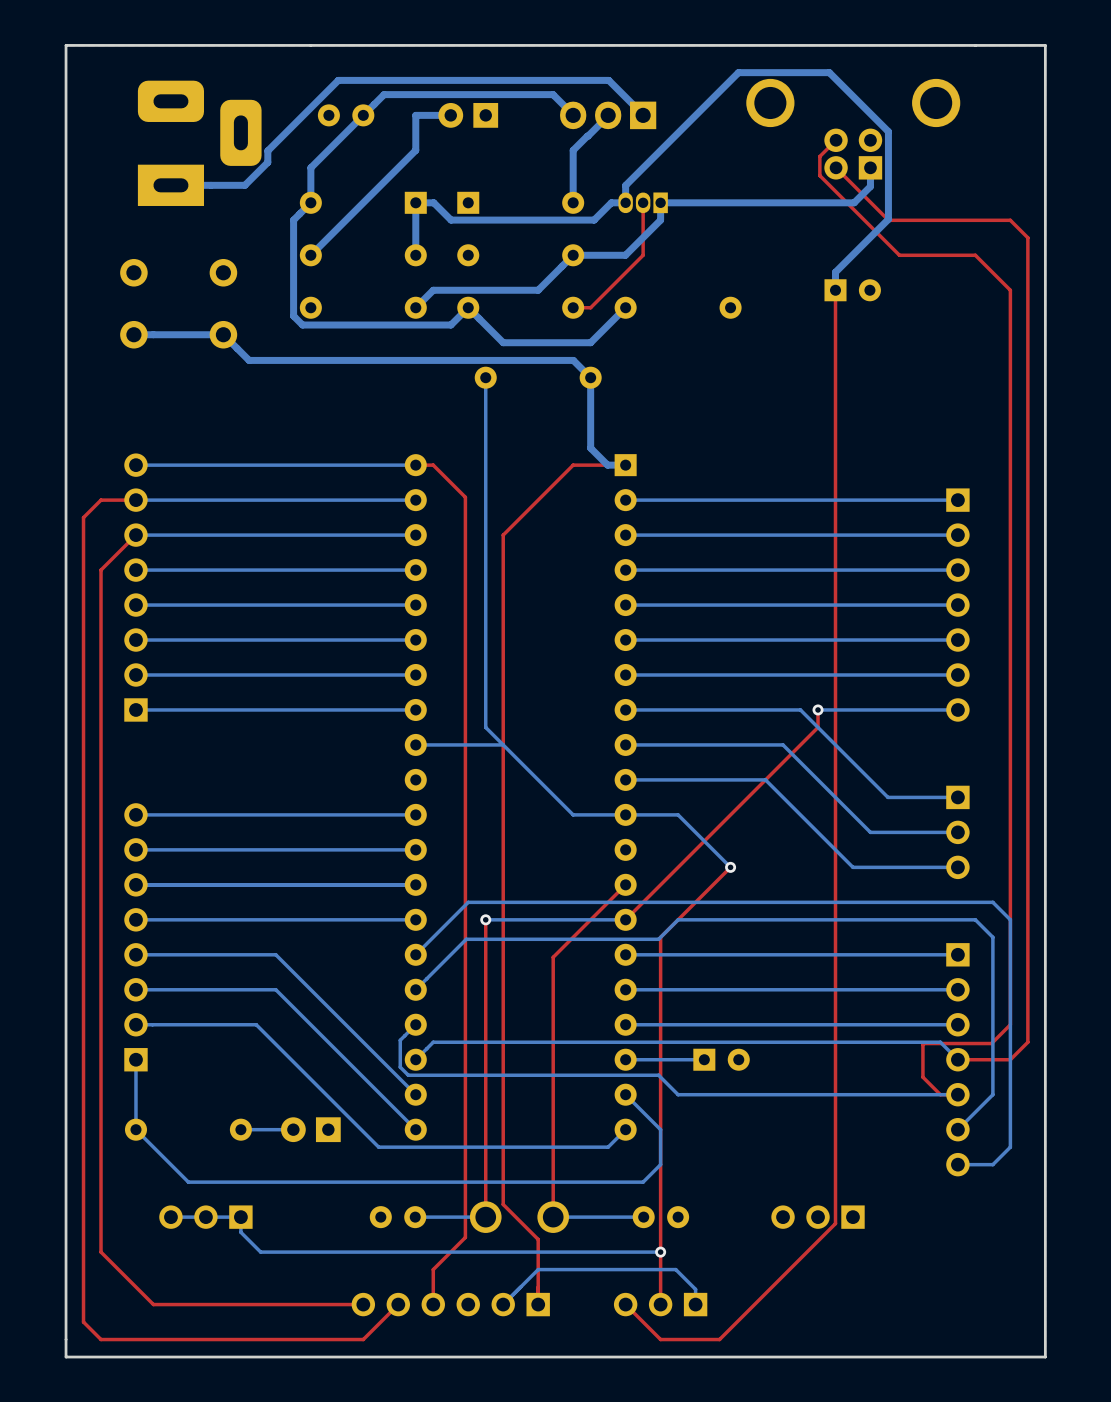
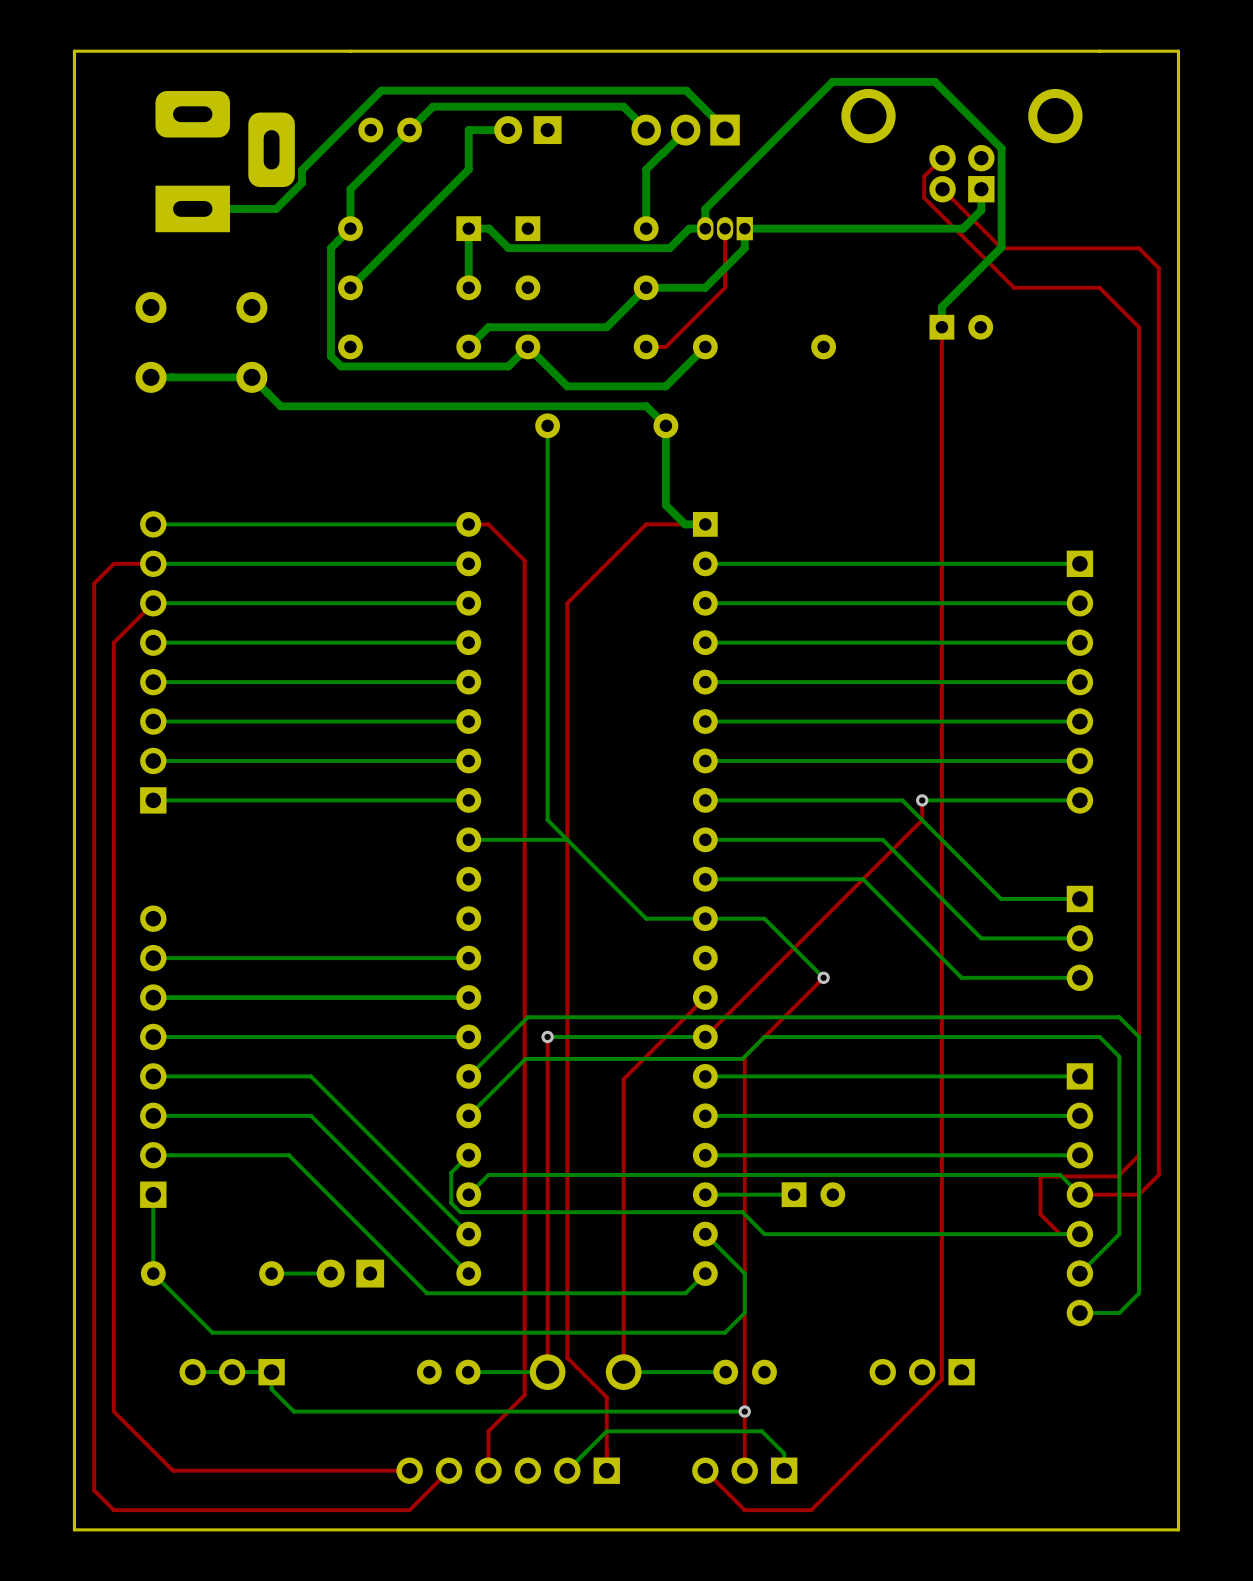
bottom track: (415, 814) (135, 814) -> none

